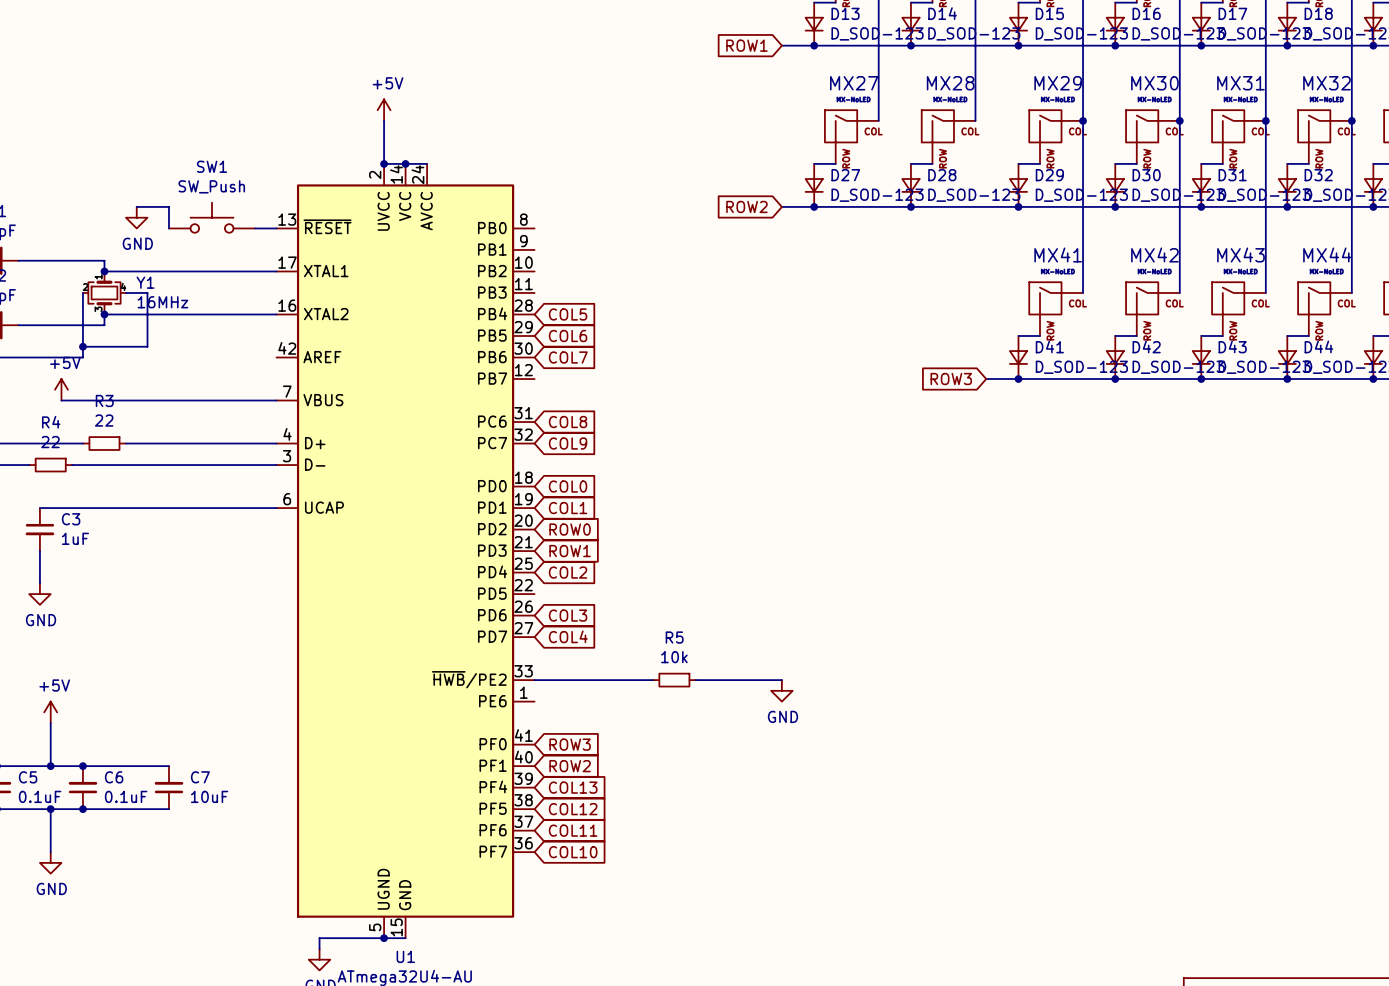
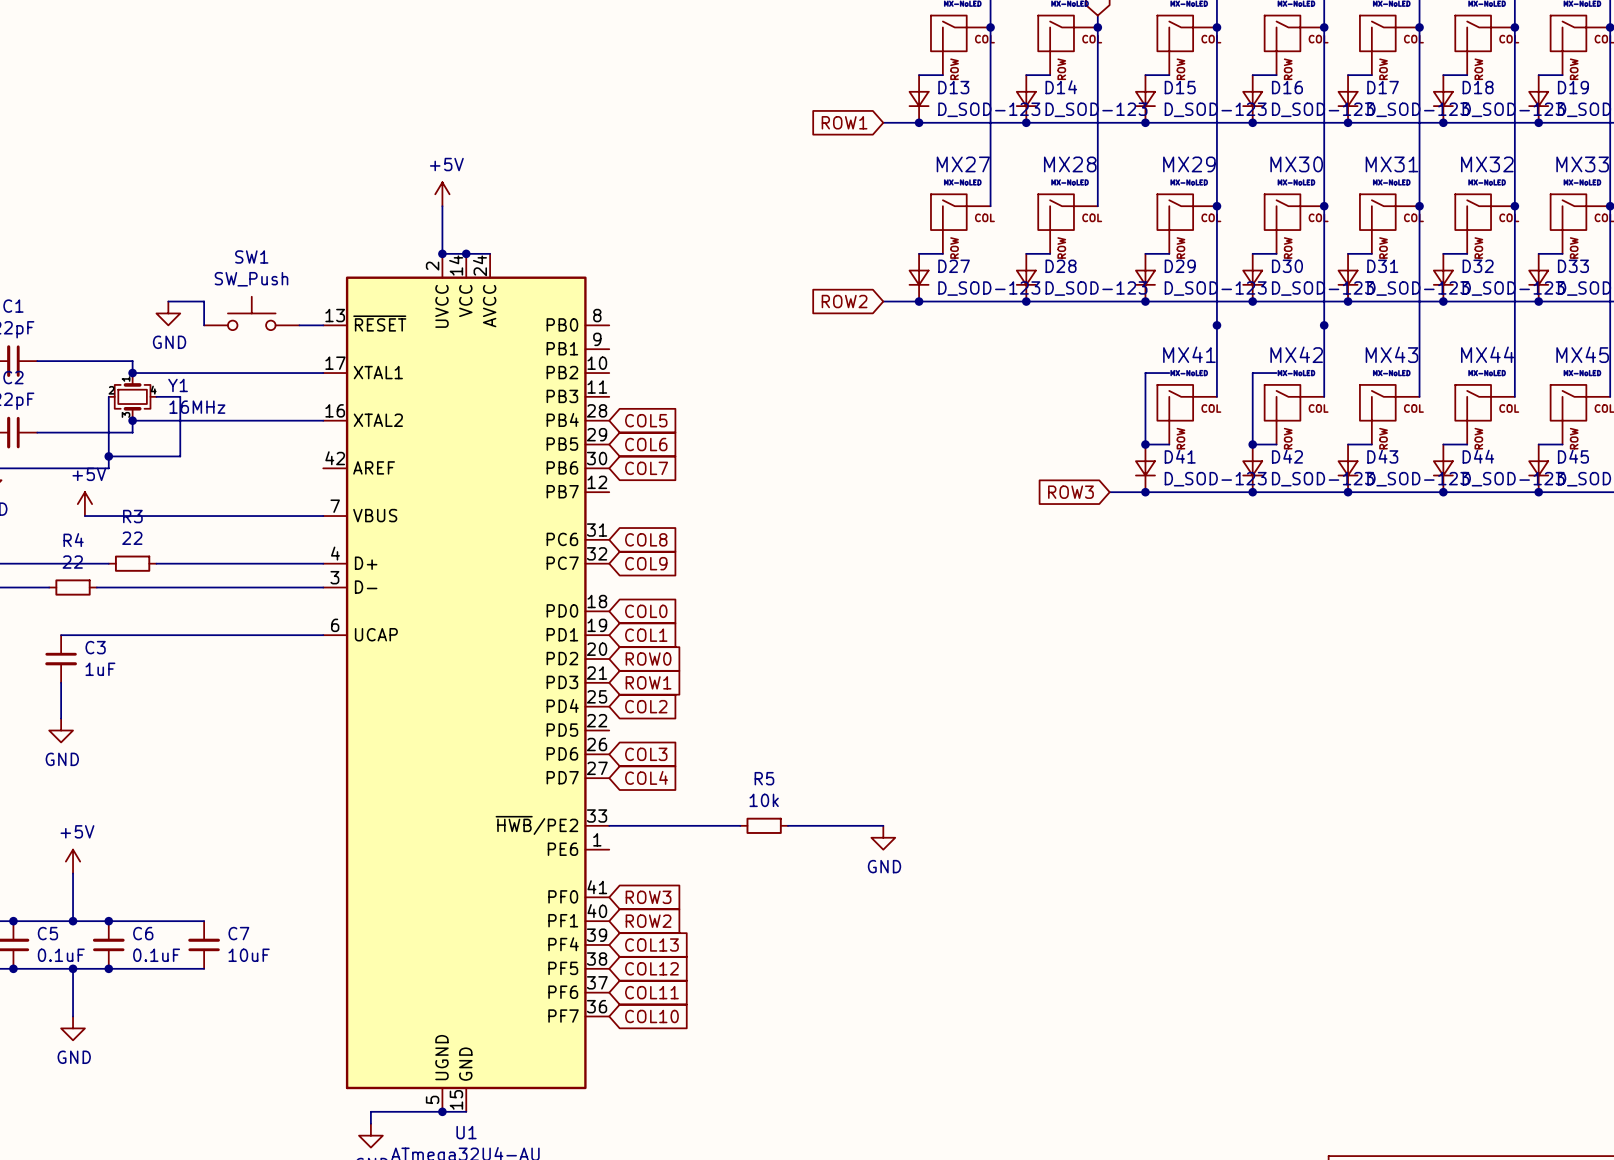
junction: none -> (1216, 325)
junction: none -> (1324, 325)
wire: none -> (1169, 373) (1145, 373) (1145, 444)
wire: none -> (1276, 373) (1252, 373) (1252, 444)
junction: none -> (1145, 444)
junction: none -> (1252, 444)

